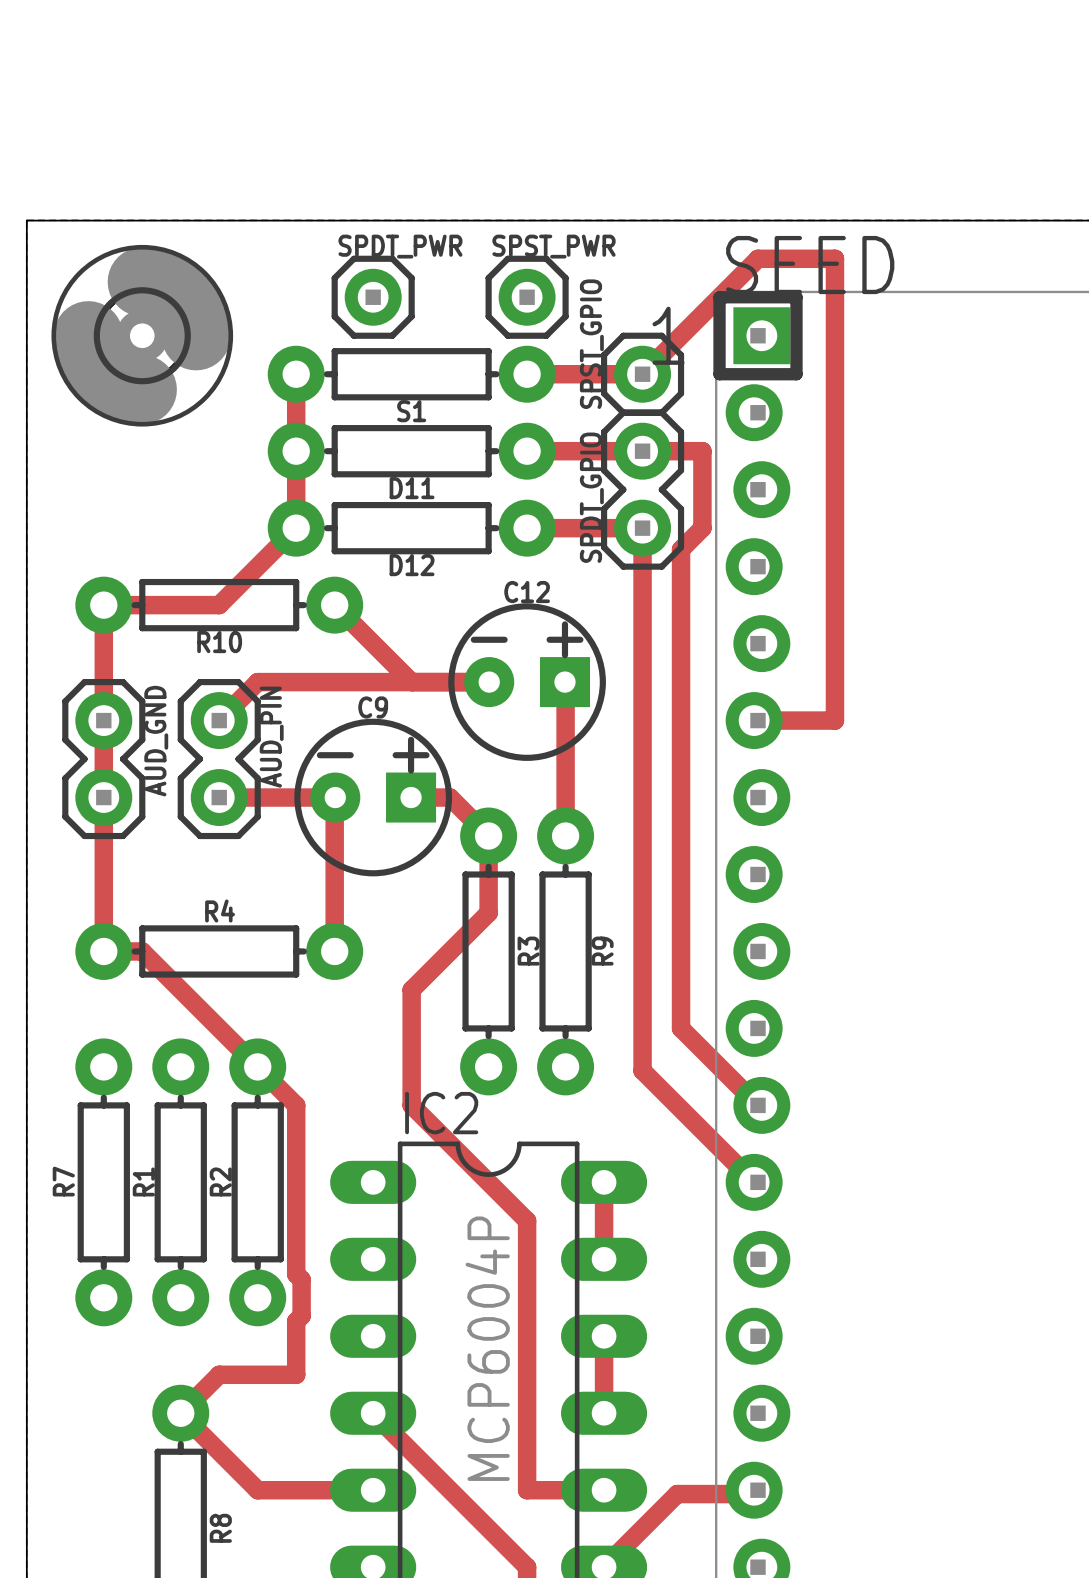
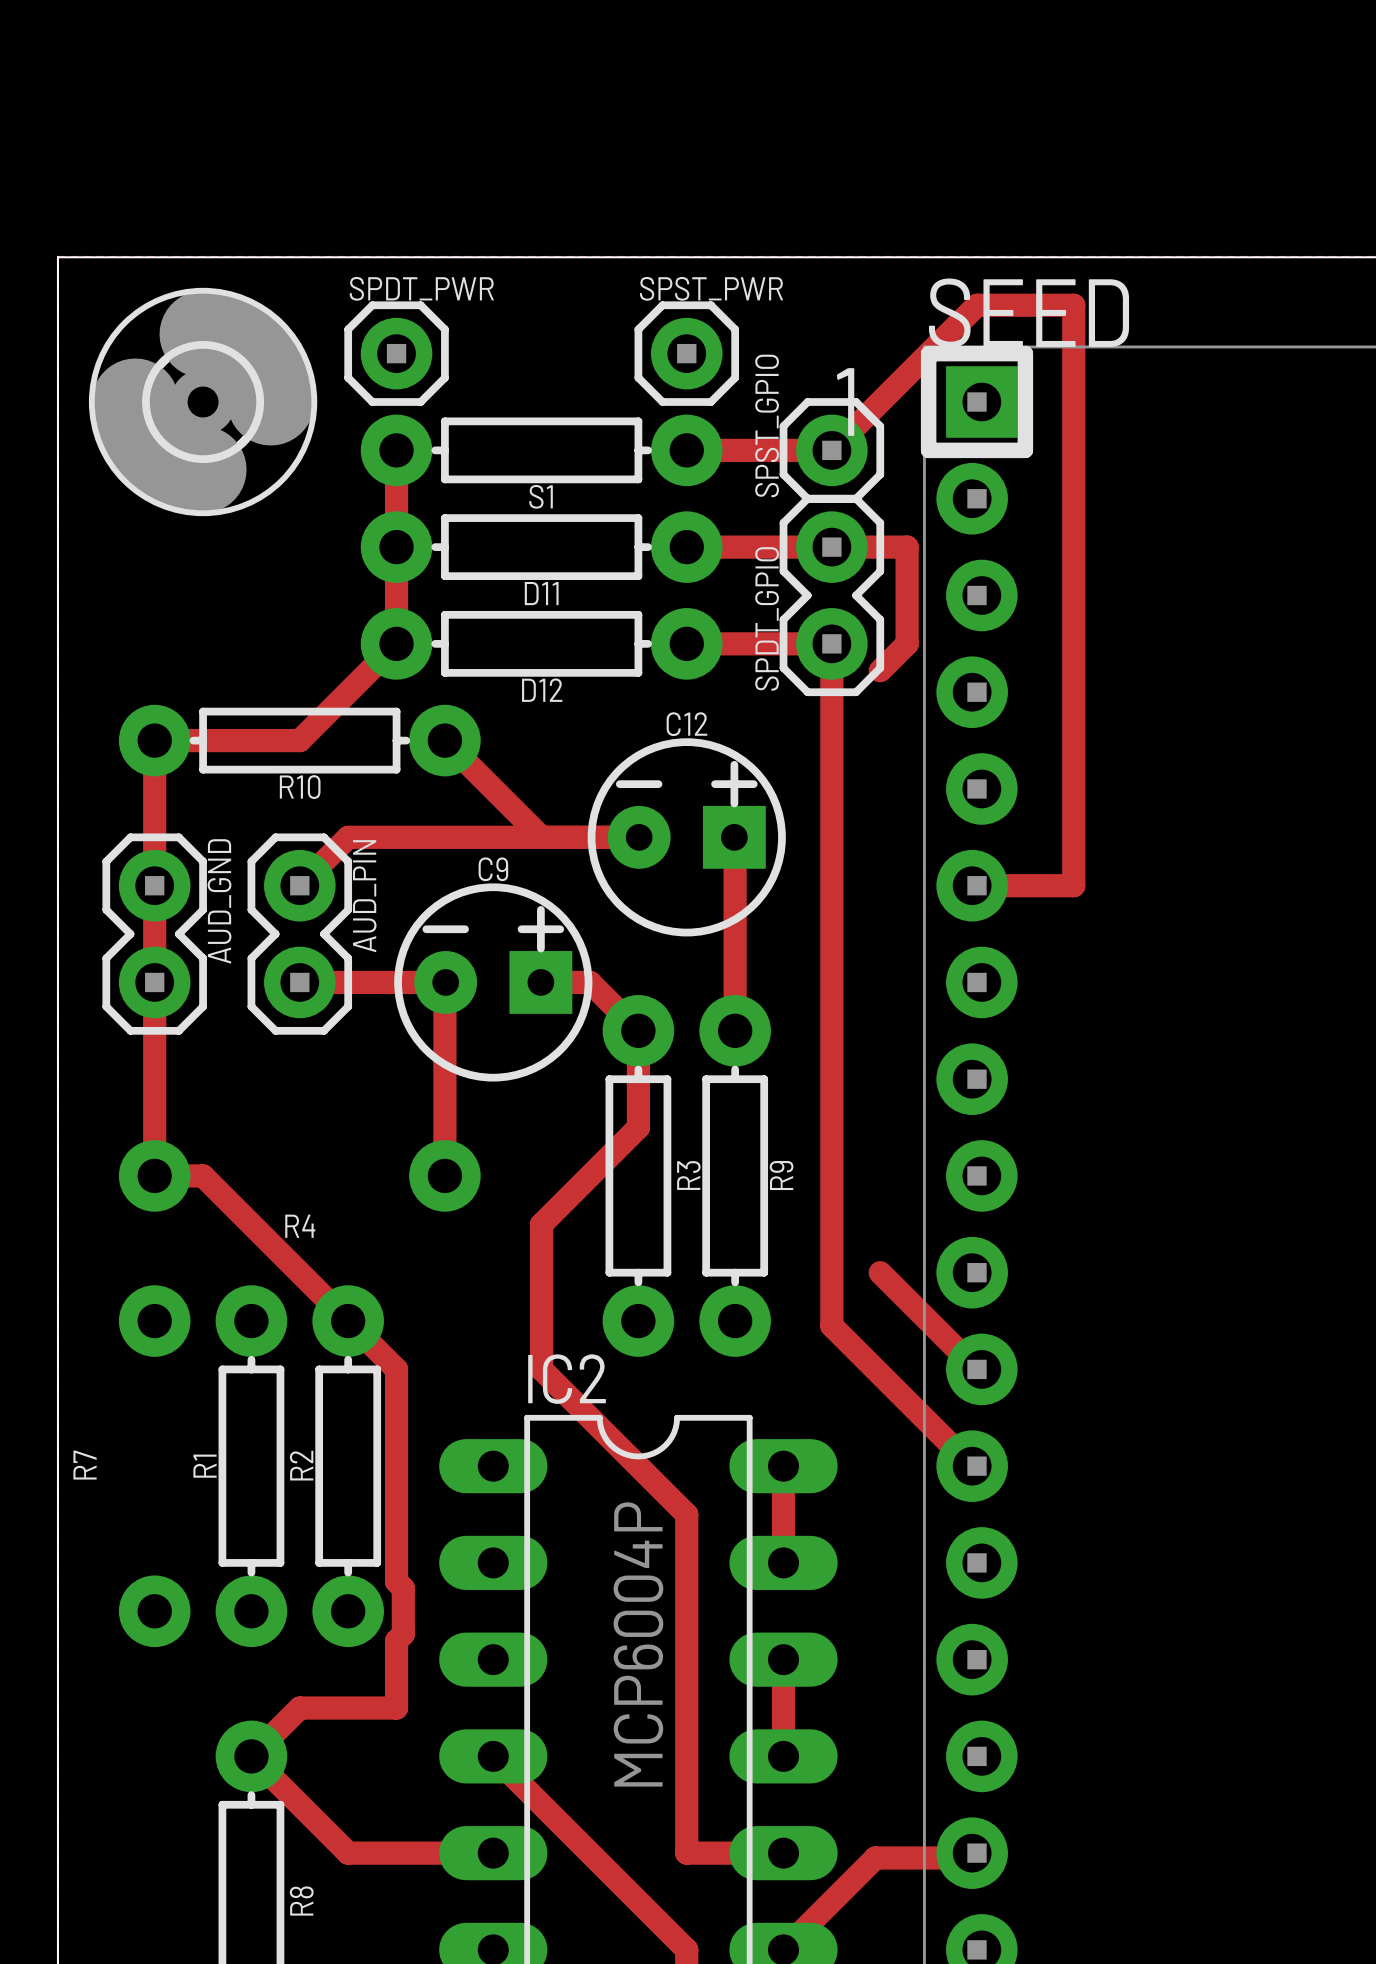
SPDT_PWR position: (373, 297) -> (396, 353)
track: (681, 549) (681, 1028) -> none
R4 side: top (219, 951) -> bottom (299, 1175)
R7 side: top (103, 1182) -> bottom (154, 1466)

